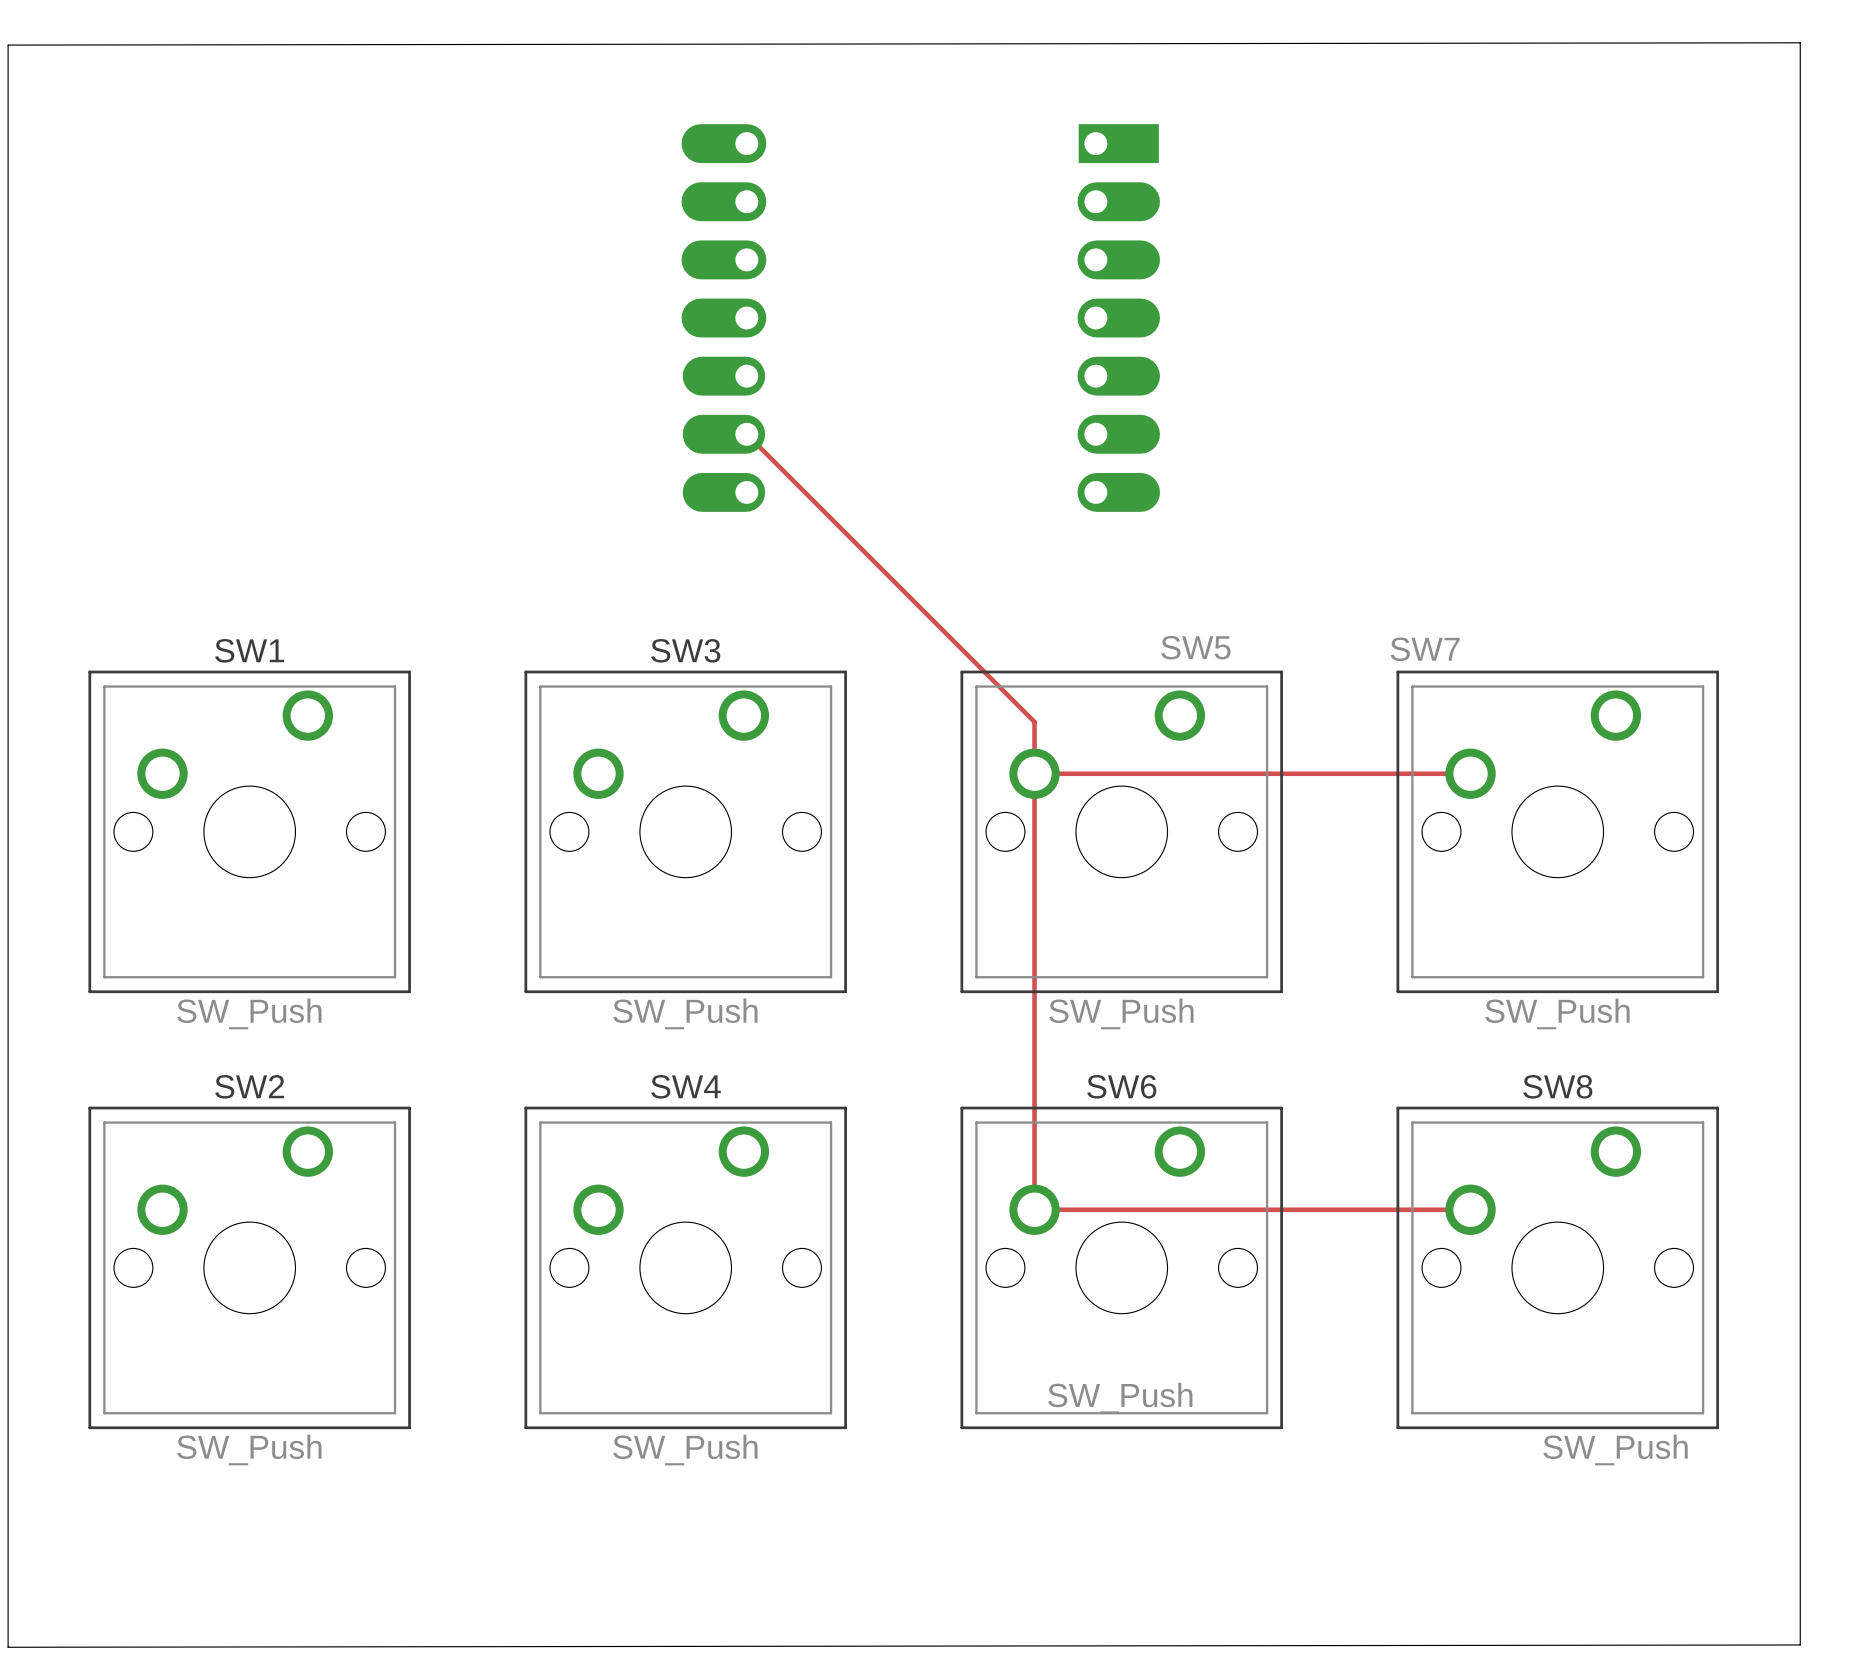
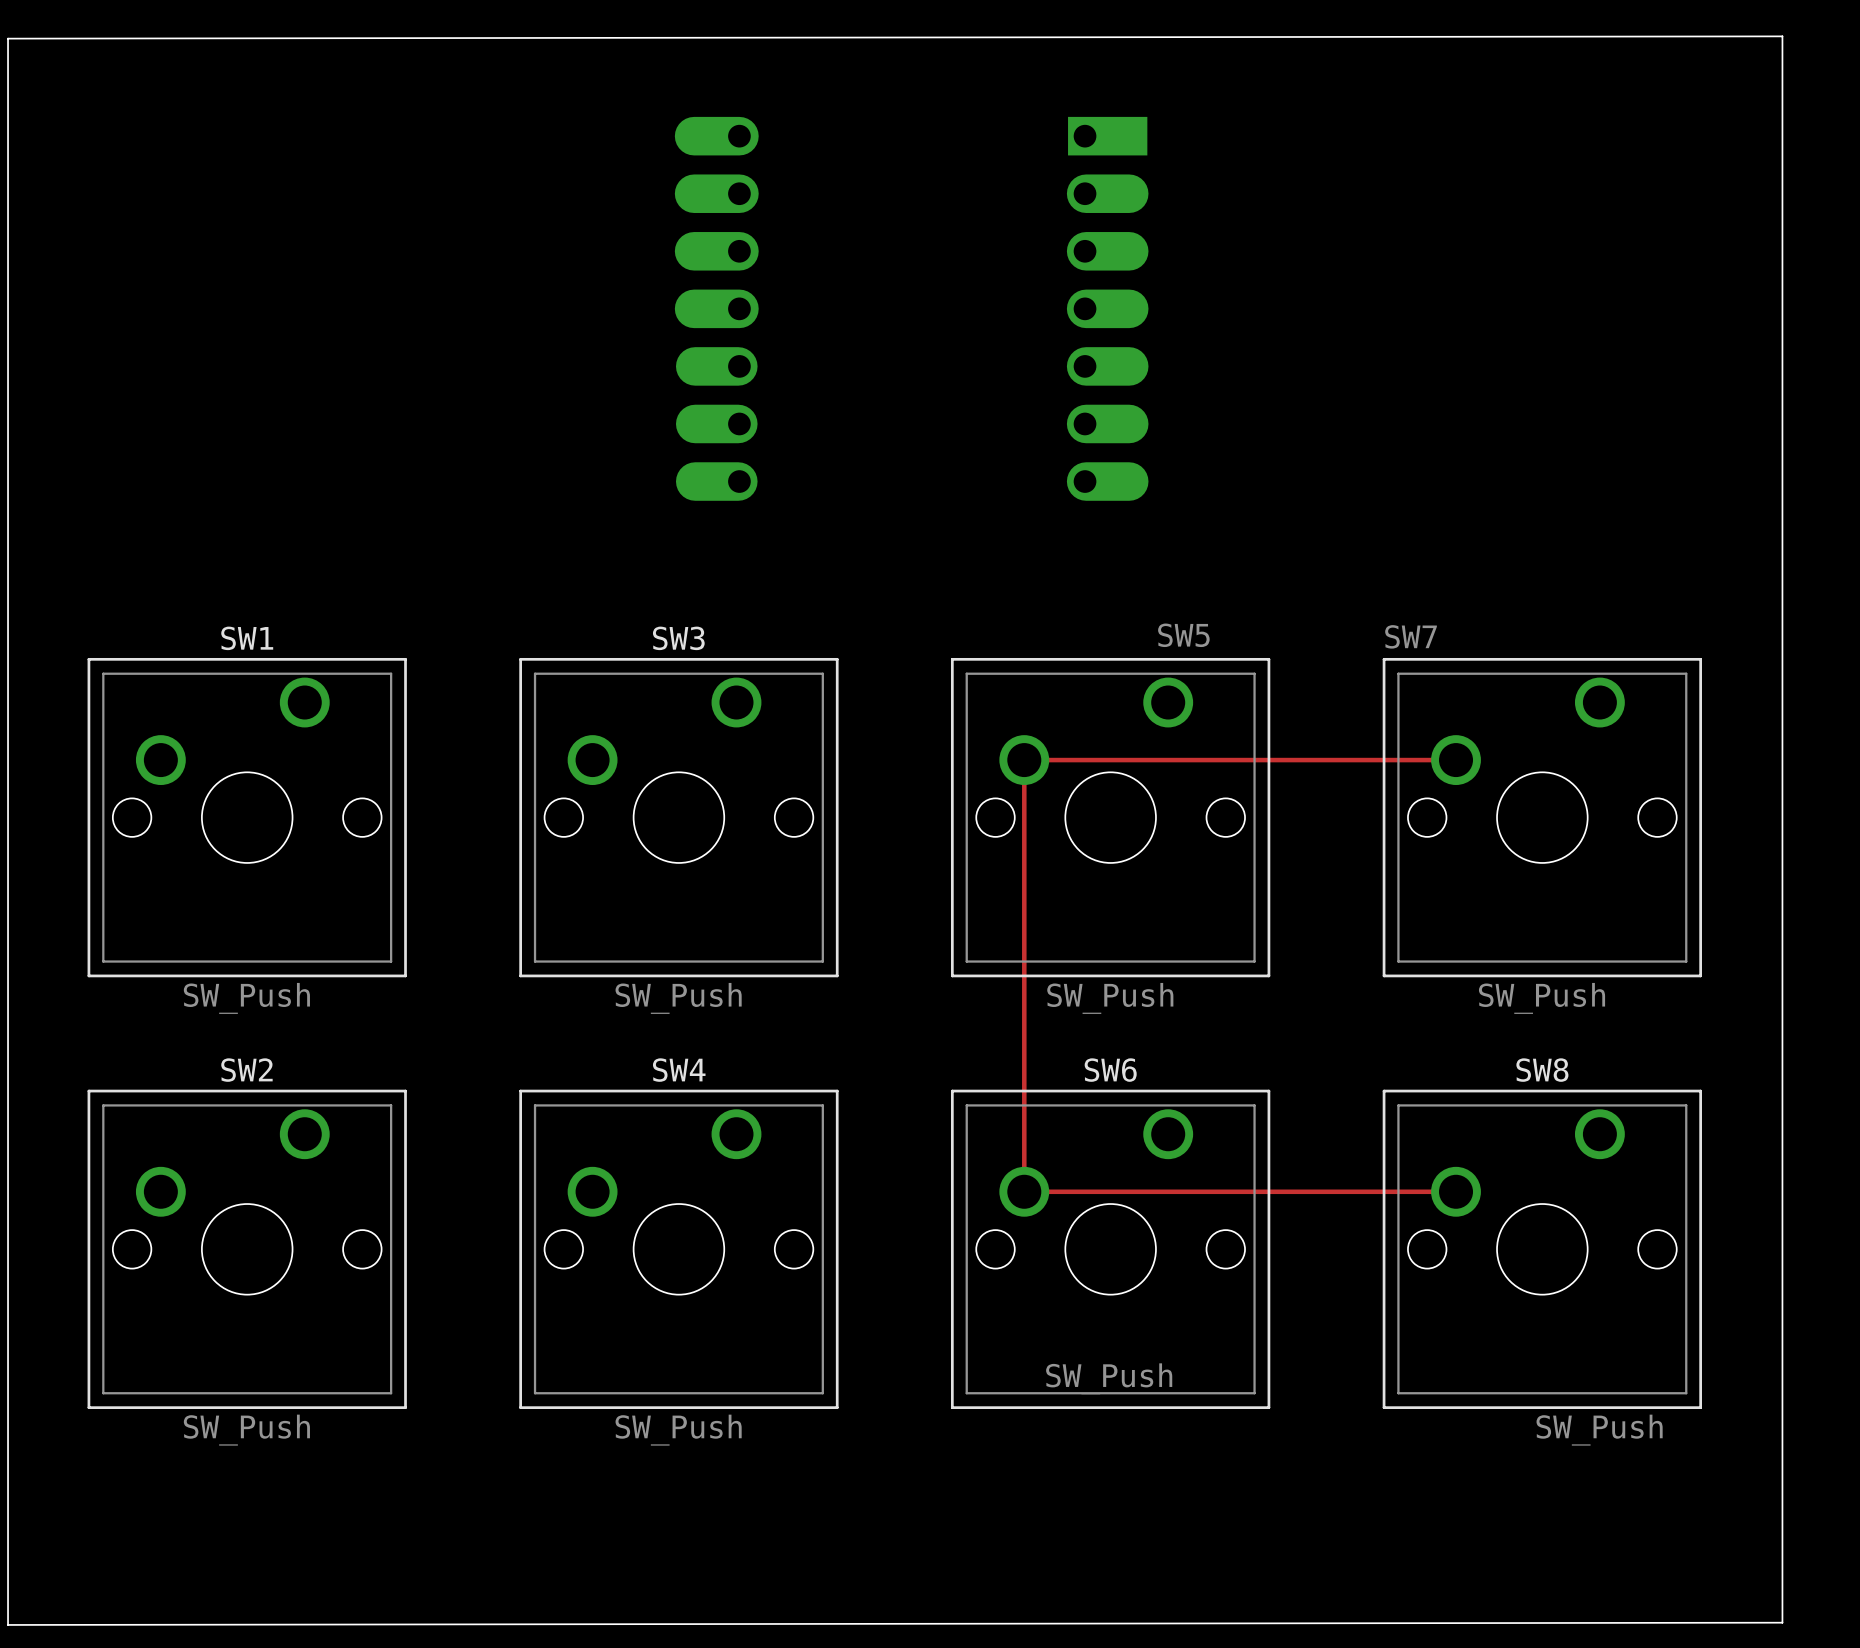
track: (746, 434) (1034, 721) (1034, 773) -> none

